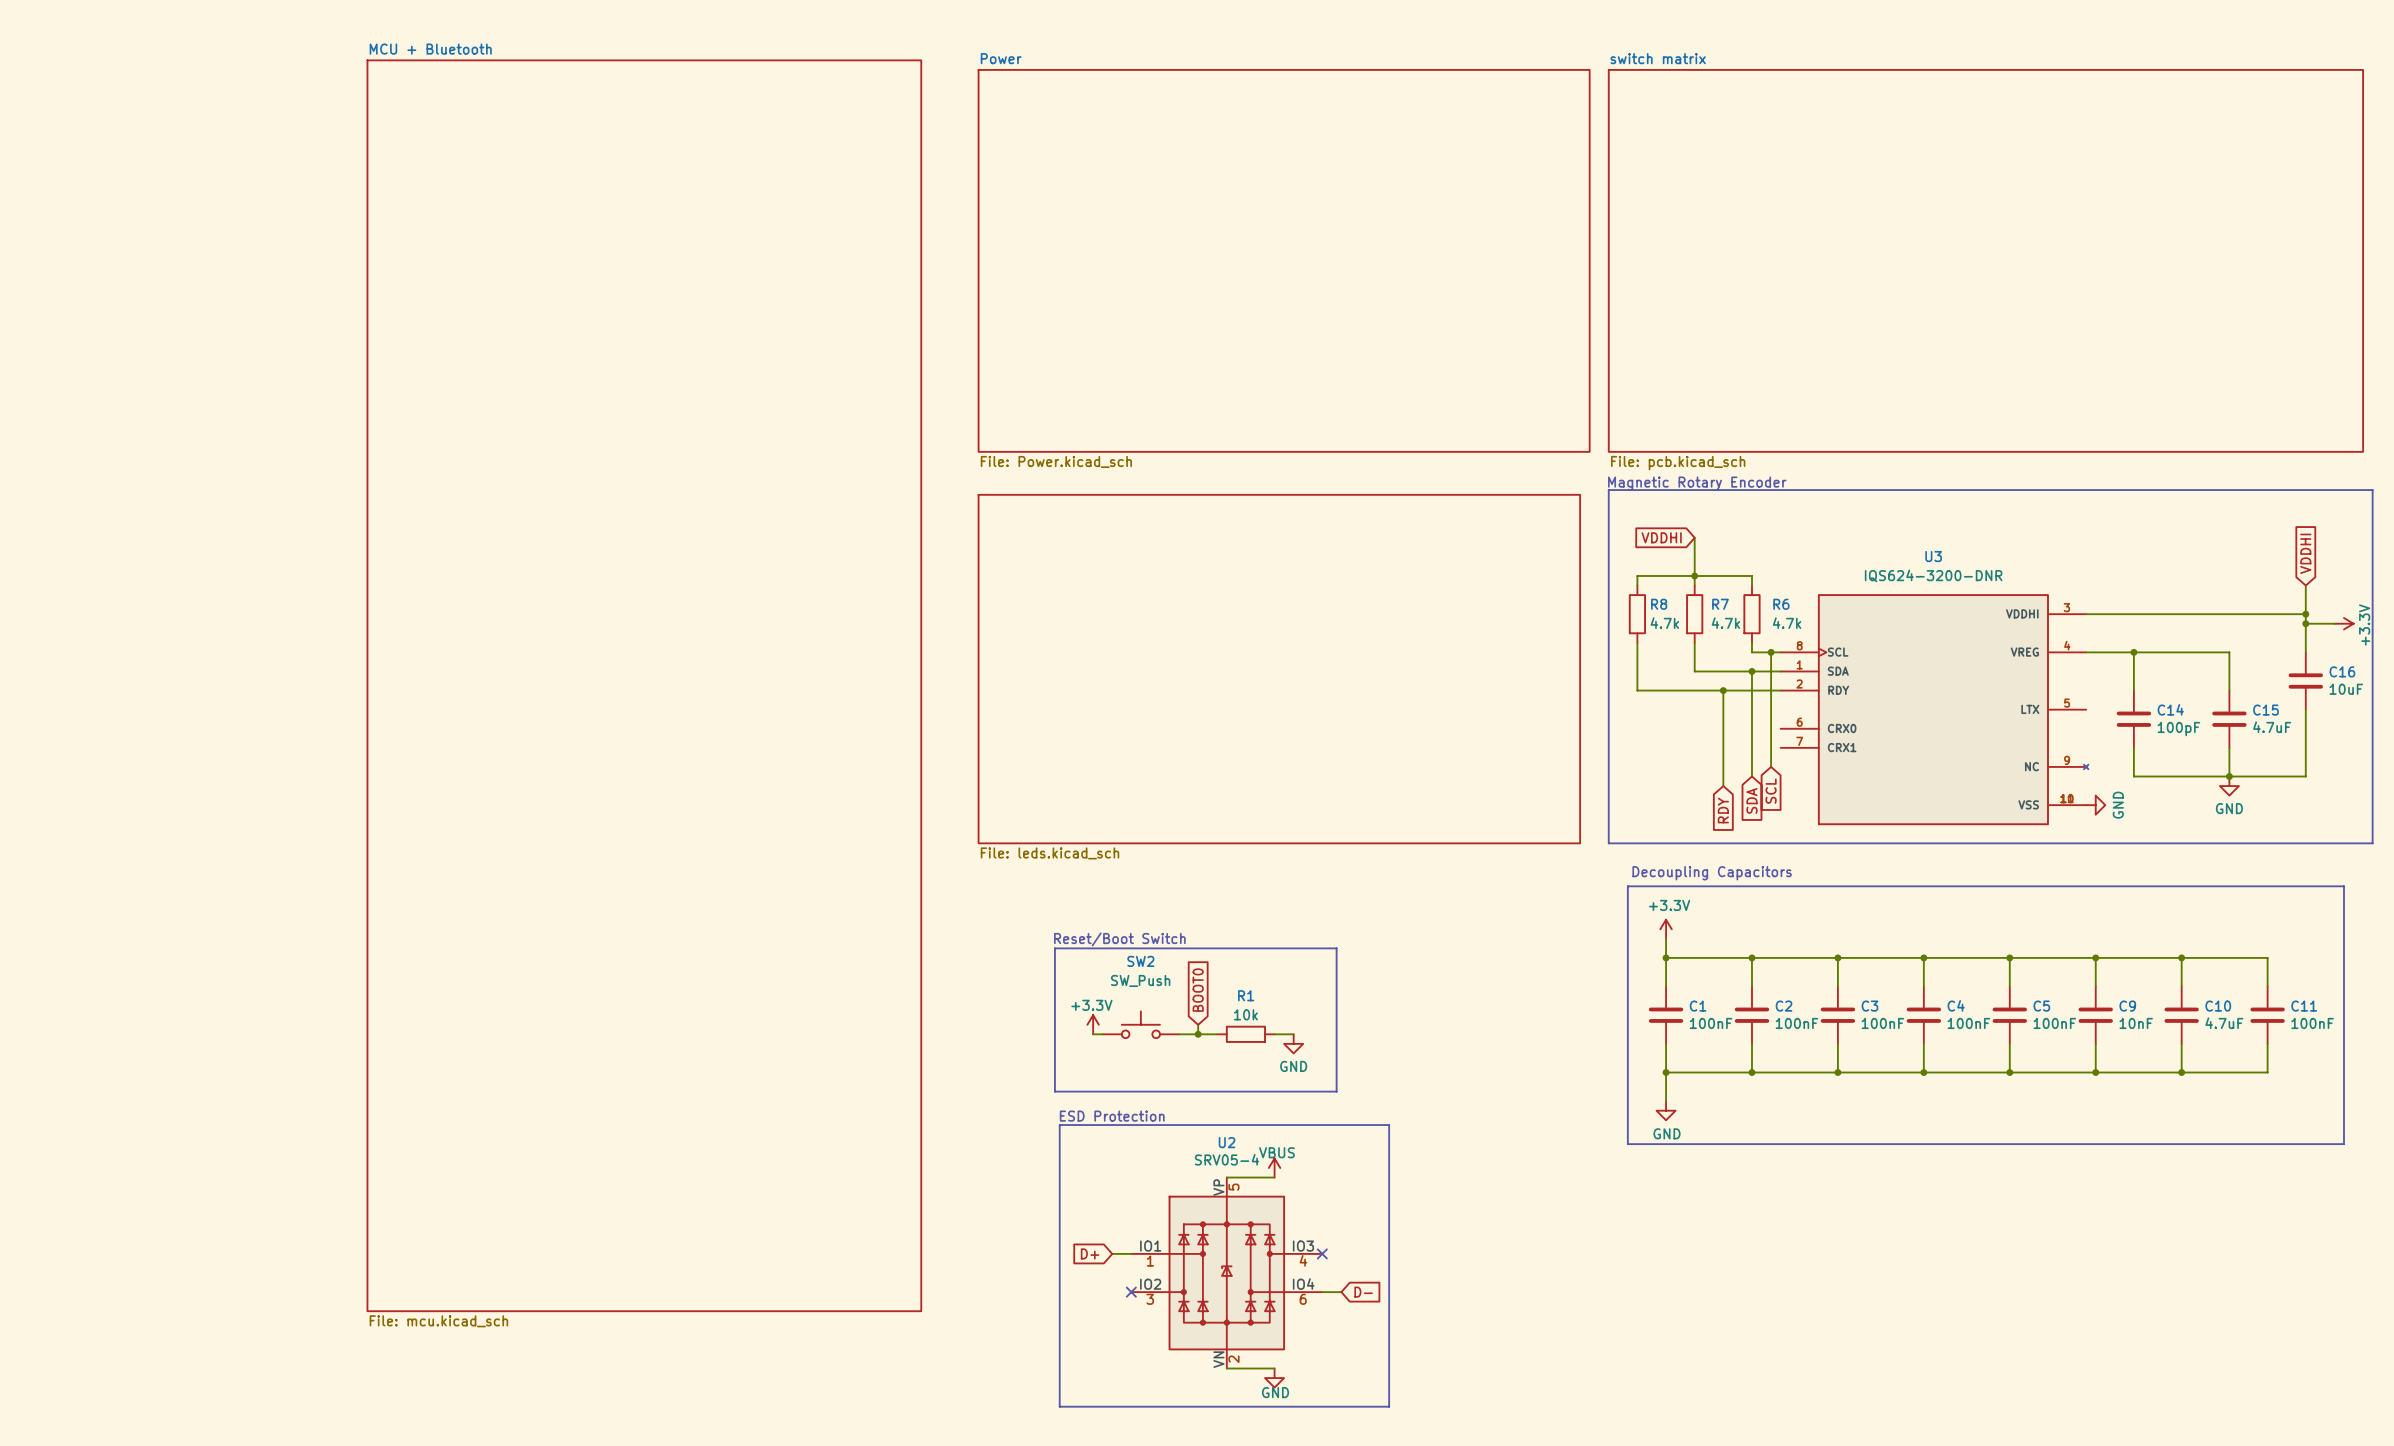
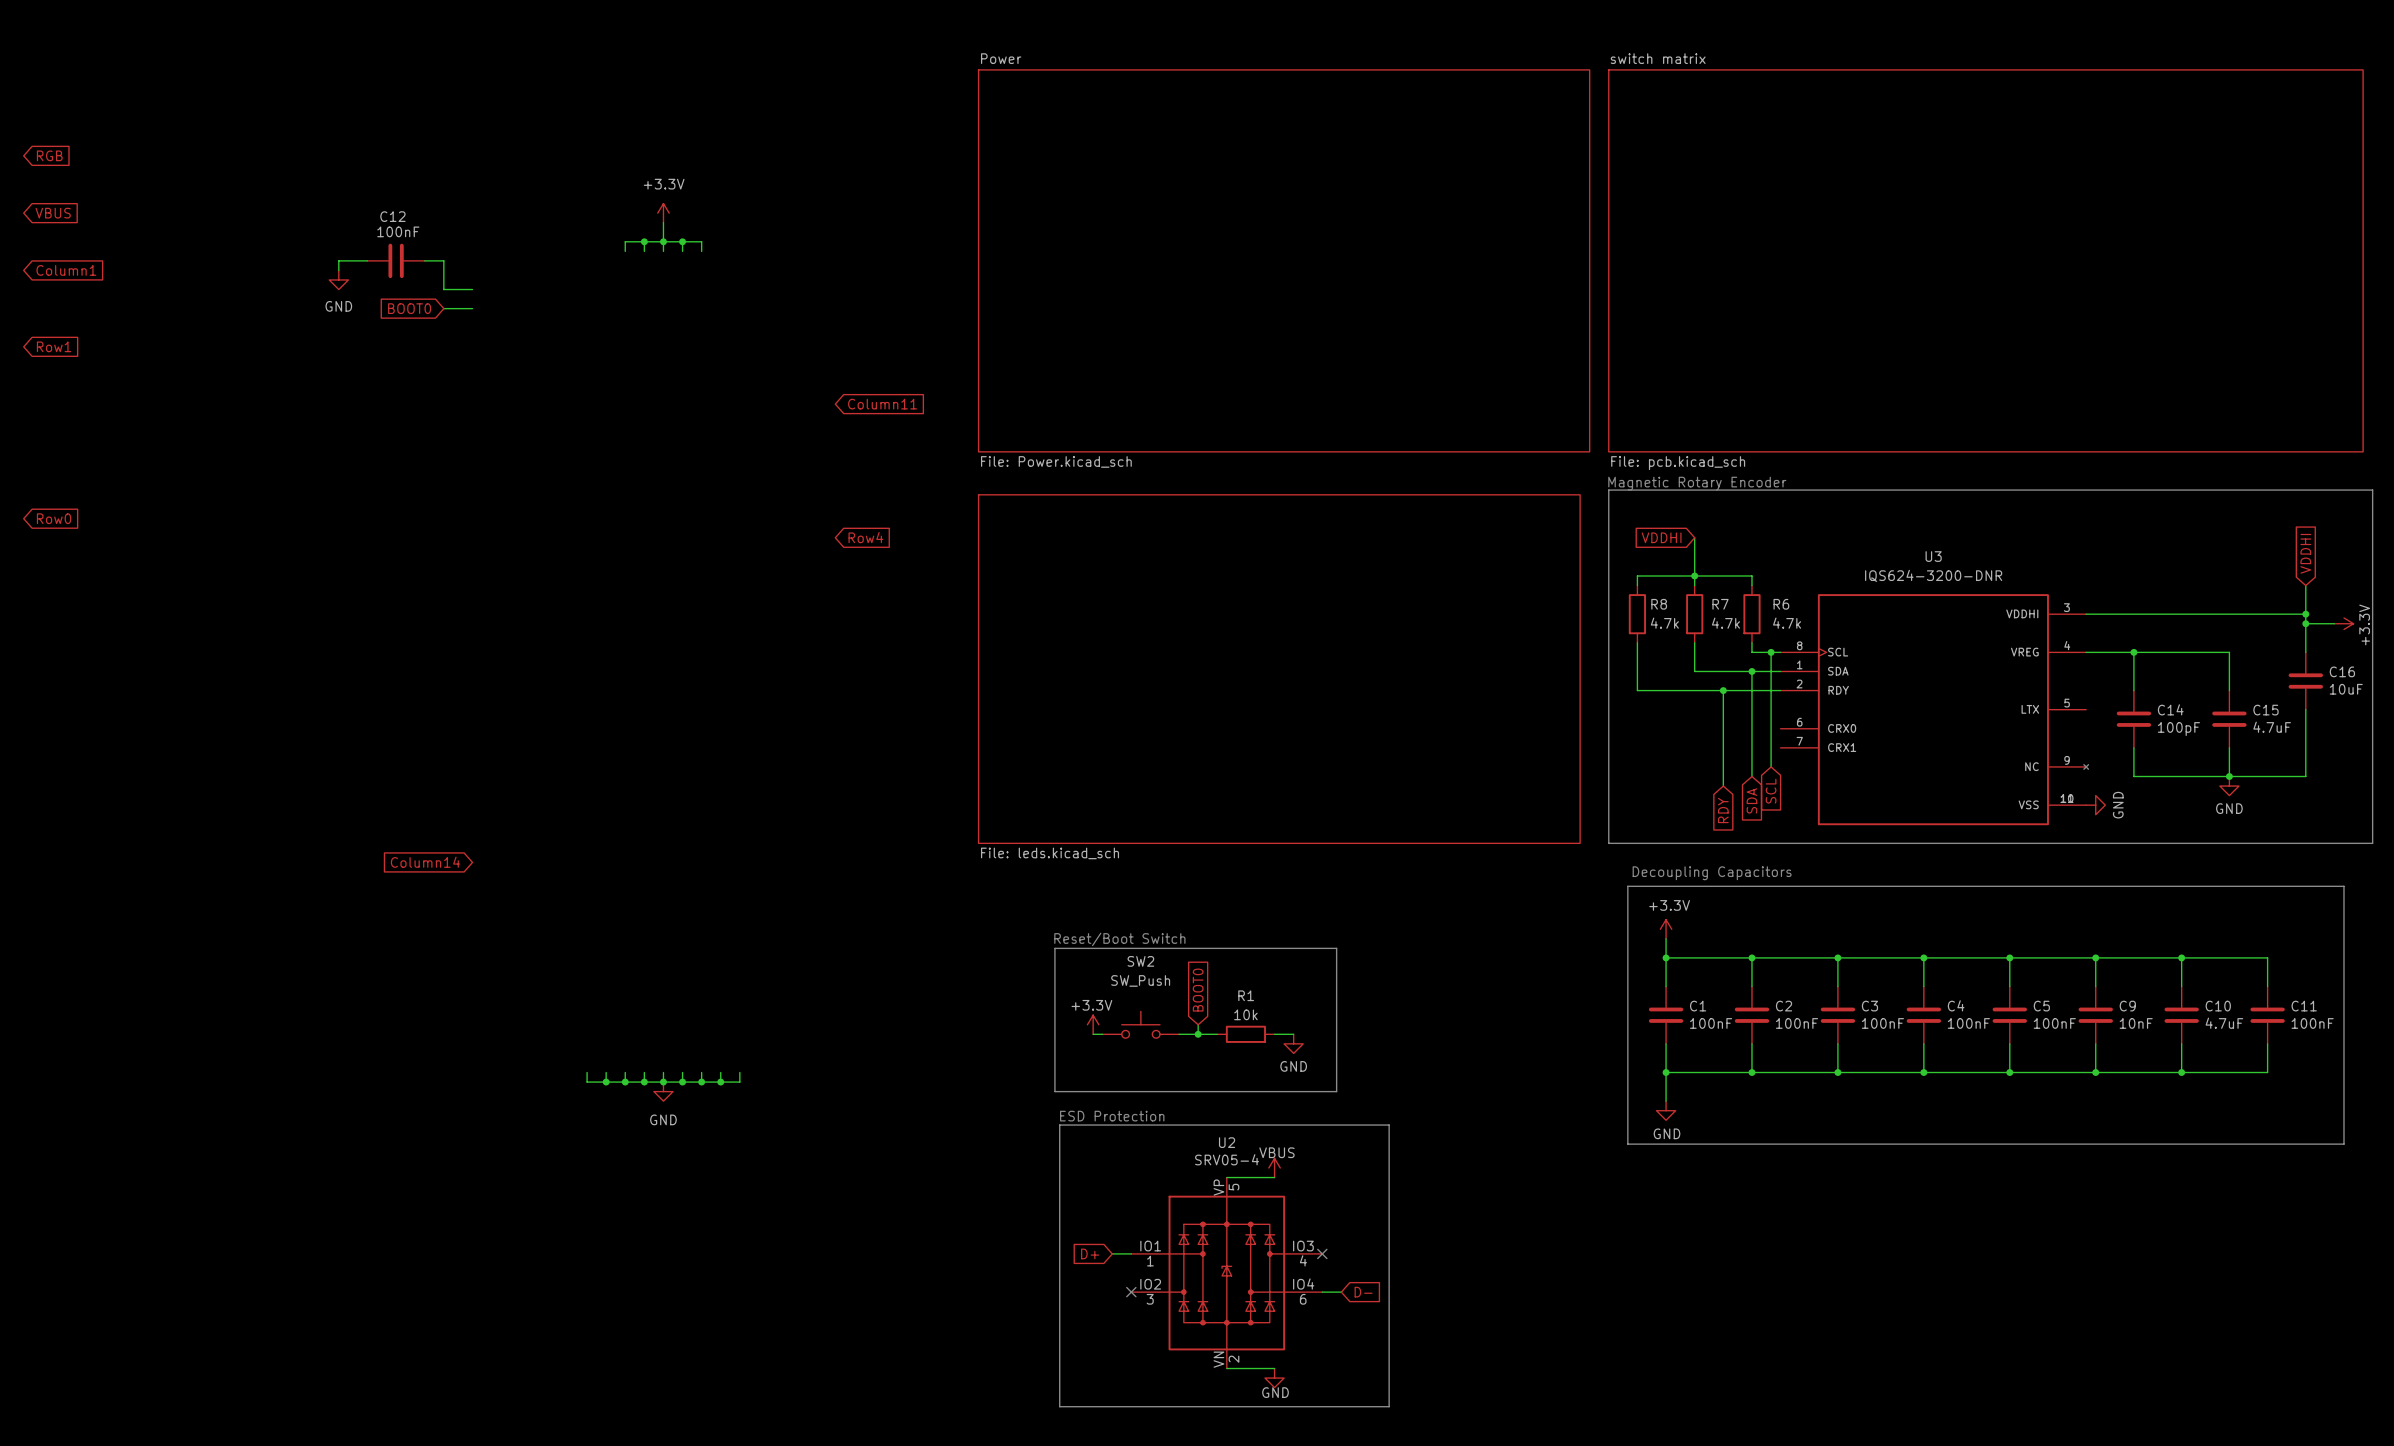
global label: none -> RGB (49, 155)
global label: none -> VBUS (53, 213)
power symbol: none -> +3.3V (663, 213)
wire: none -> (663, 222) (663, 251)
wire: none -> (644, 241) (644, 251)
junction: none -> (644, 241)
junction: none -> (663, 241)
wire: none -> (682, 241) (682, 251)
junction: none -> (682, 241)
wire: none -> (625, 251) (625, 241) (701, 241) (701, 251)
wire: none -> (367, 260) (338, 260) (338, 270)
C12: none -> 100nF (396, 260)
wire: none -> (424, 260) (443, 260) (443, 289) (472, 289)
global label: none -> Column1 (66, 270)
power symbol: none -> GND (338, 279)
global label: none -> BOOT0 (409, 308)
wire: none -> (443, 308) (472, 308)
global label: none -> Row1 (54, 346)
global label: none -> Column11 (882, 404)
global label: none -> Row0 (54, 518)
global label: none -> Row4 (865, 537)
sheet MCU + Bluetooth: File: mcu.kicad_sch (644, 685) -> none
global label: none -> Column14 (425, 862)
wire: none -> (587, 1072) (587, 1082) (739, 1082) (739, 1072)
wire: none -> (606, 1072) (606, 1082)
wire: none -> (625, 1072) (625, 1082)
wire: none -> (644, 1072) (644, 1082)
wire: none -> (663, 1072) (663, 1082)
wire: none -> (682, 1072) (682, 1082)
wire: none -> (701, 1072) (701, 1082)
wire: none -> (720, 1072) (720, 1082)
junction: none -> (606, 1082)
junction: none -> (625, 1082)
junction: none -> (644, 1082)
junction: none -> (663, 1082)
junction: none -> (682, 1082)
junction: none -> (701, 1082)
junction: none -> (720, 1082)
power symbol: none -> GND (663, 1091)

